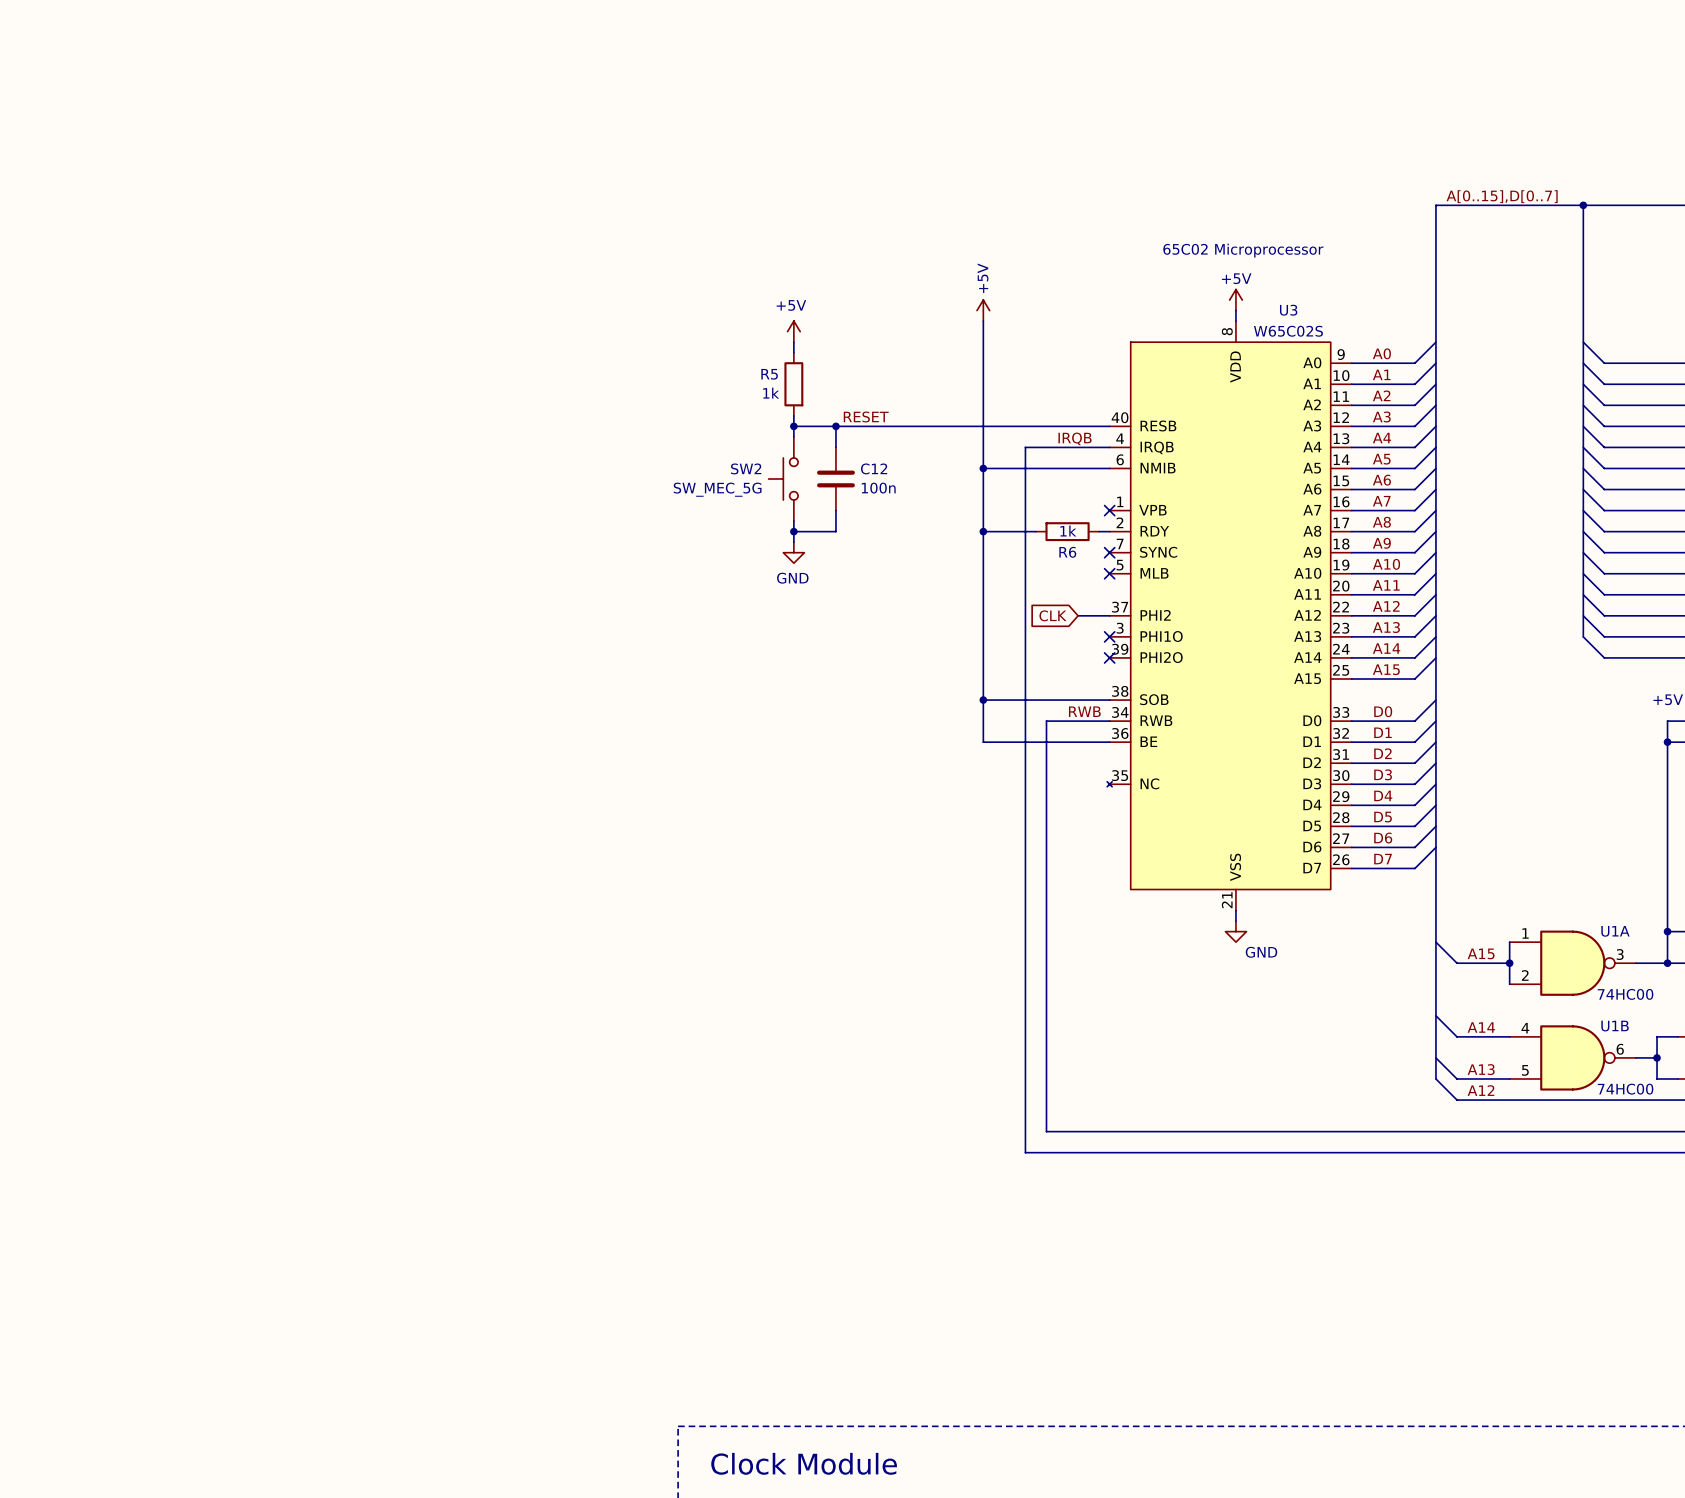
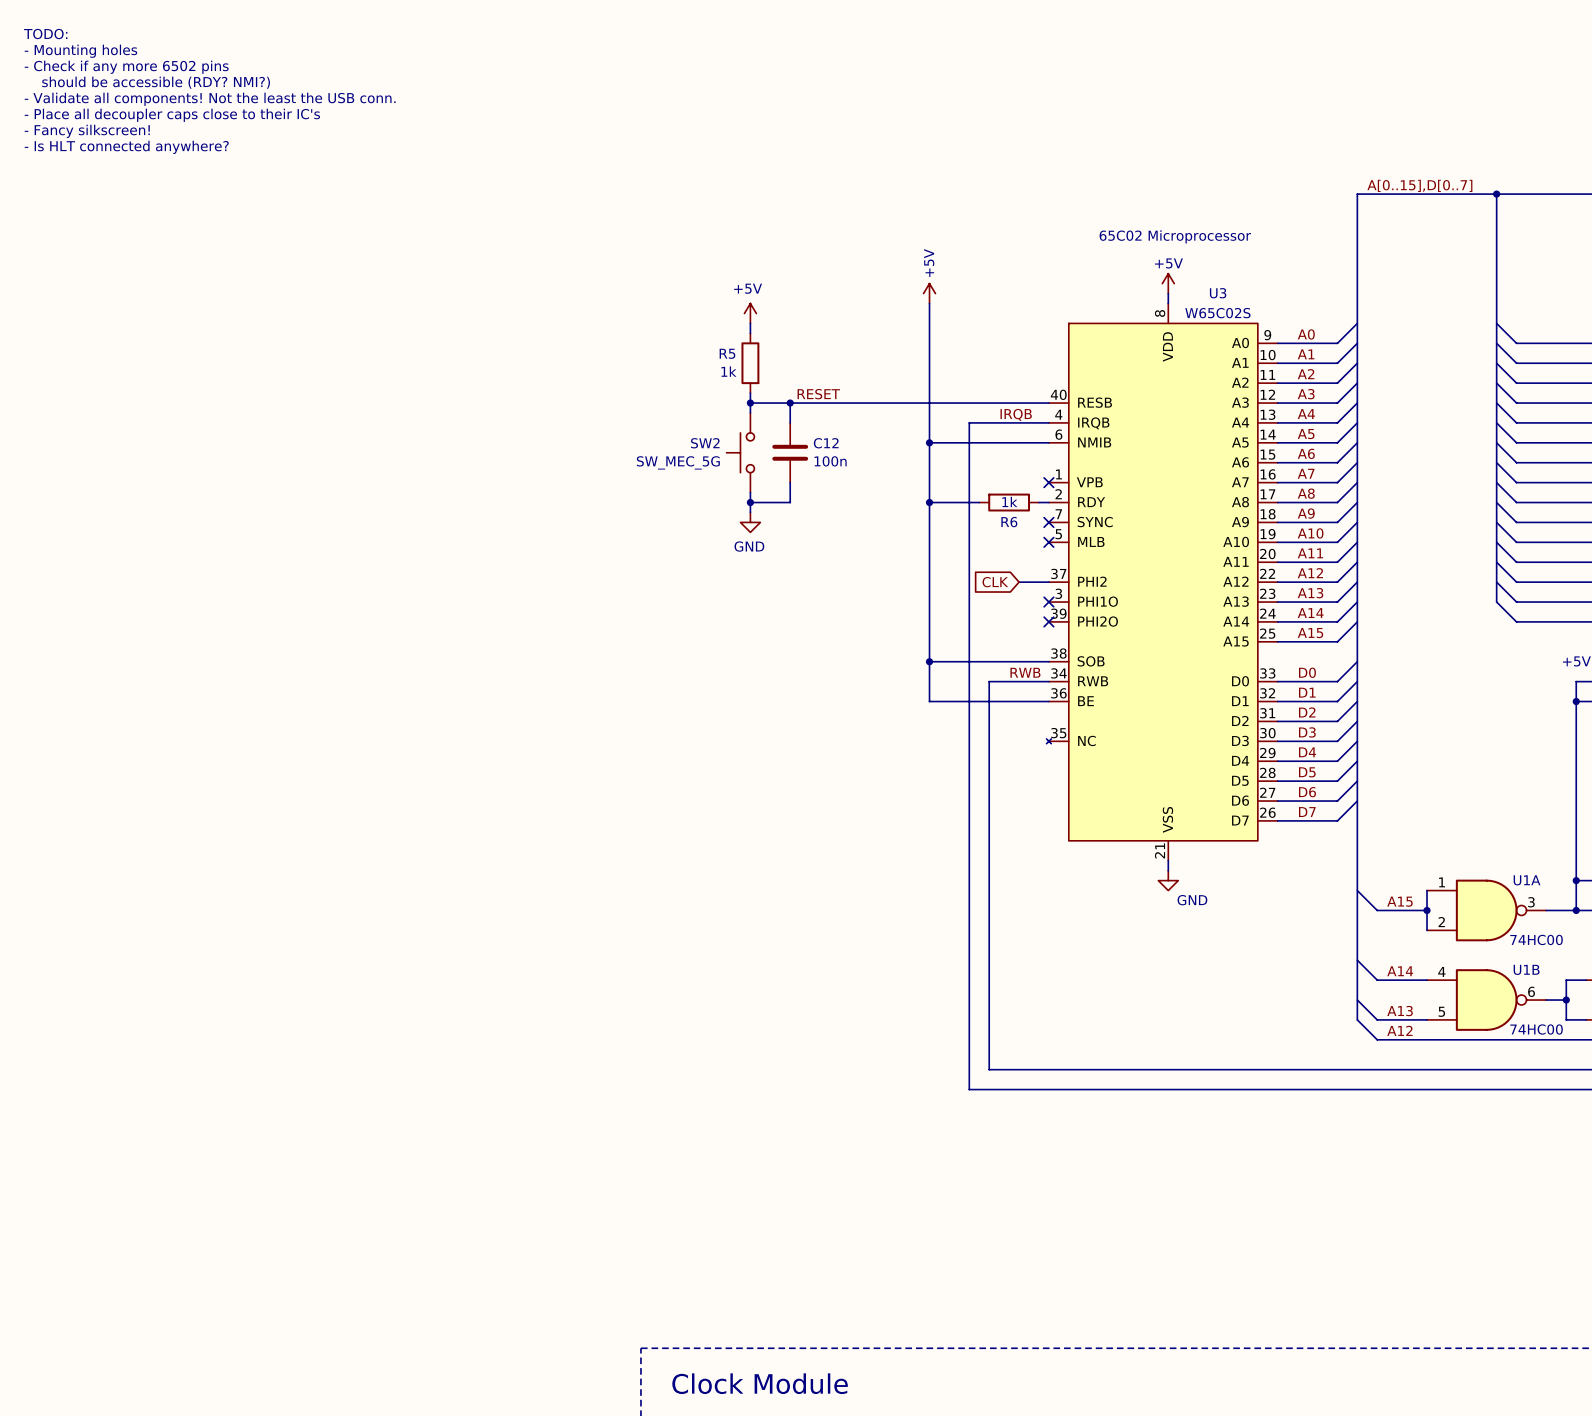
text: none -> TODO: (45, 34)
text: none -> - Mounting holes (80, 51)
text: none -> - Check if any more 6502 pins (126, 67)
text: none -> should be accessible (RDY? NMI?) (156, 82)
text: none -> - Validate all components! Not the least the USB conn. (210, 99)
text: none -> - Place all decoupler caps close to their IC's (172, 115)
text: none -> - Fancy silkscreen! (87, 131)
text: none -> - Is HLT connected anywhere? (126, 147)

